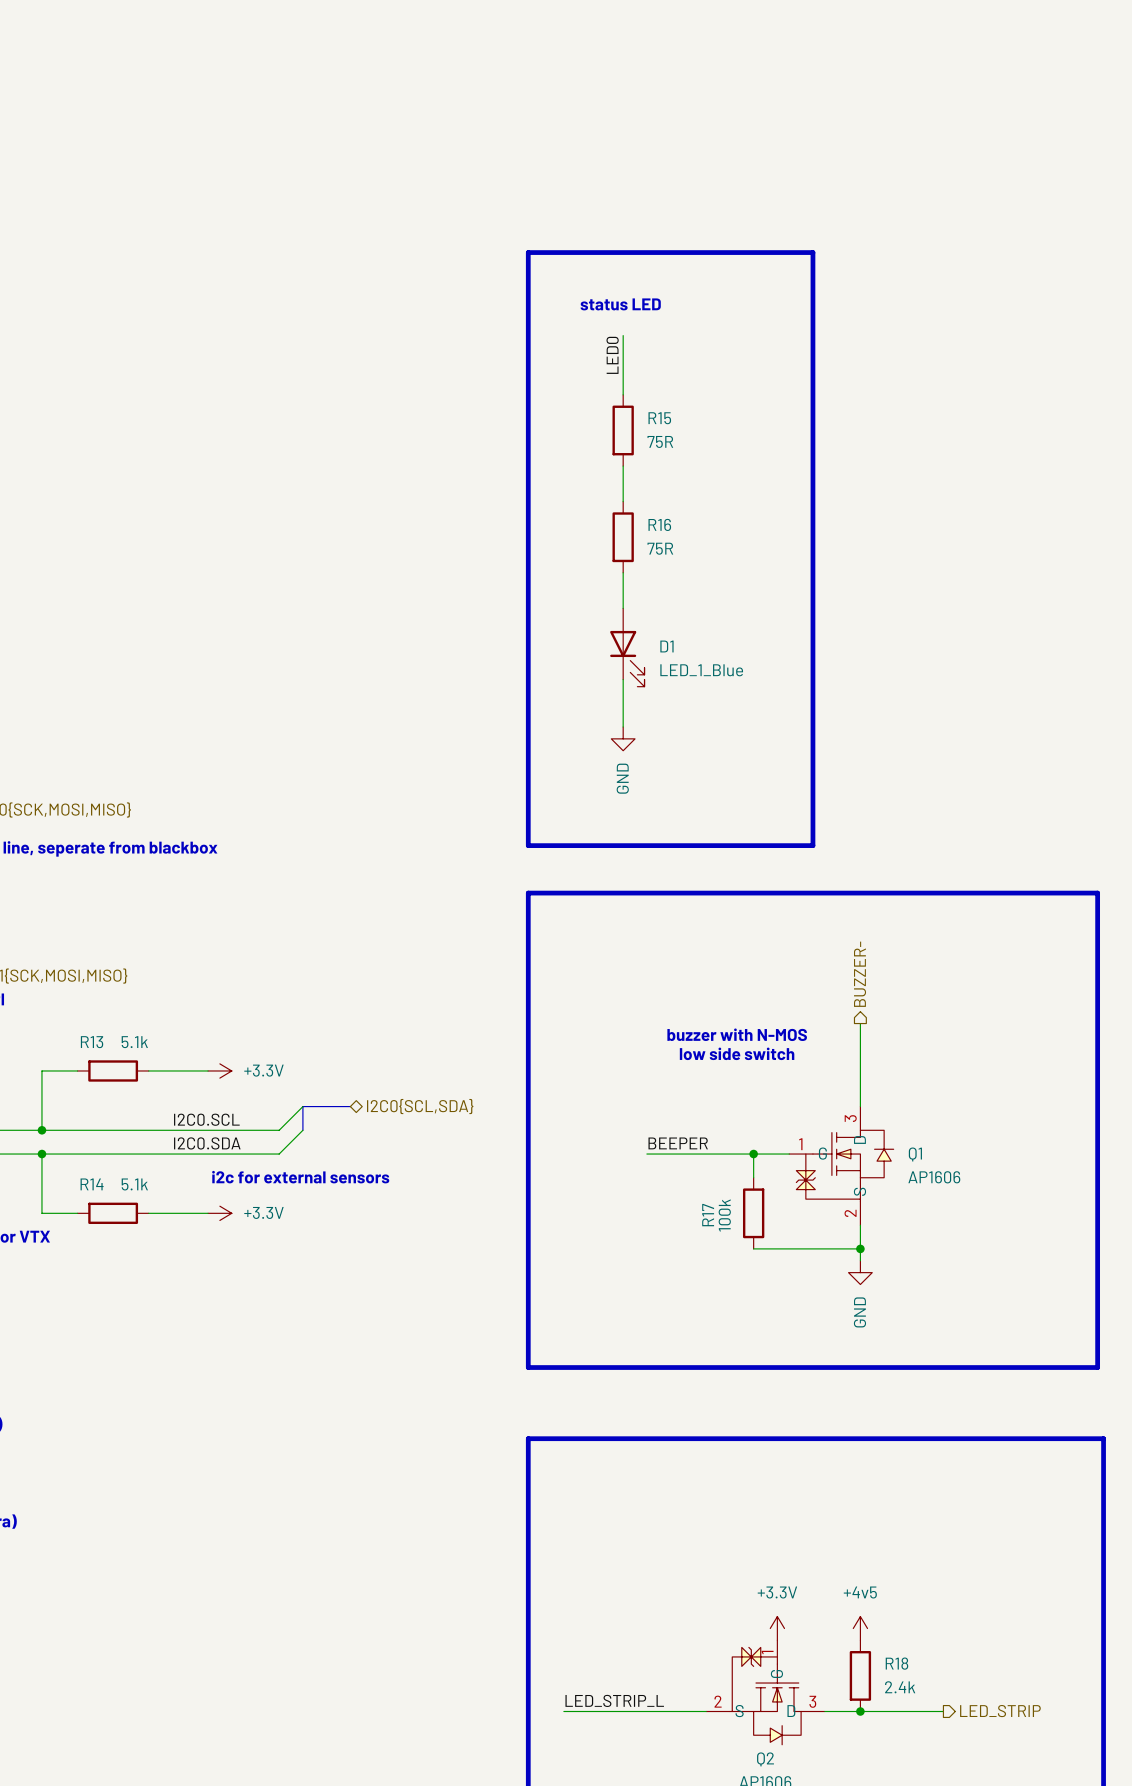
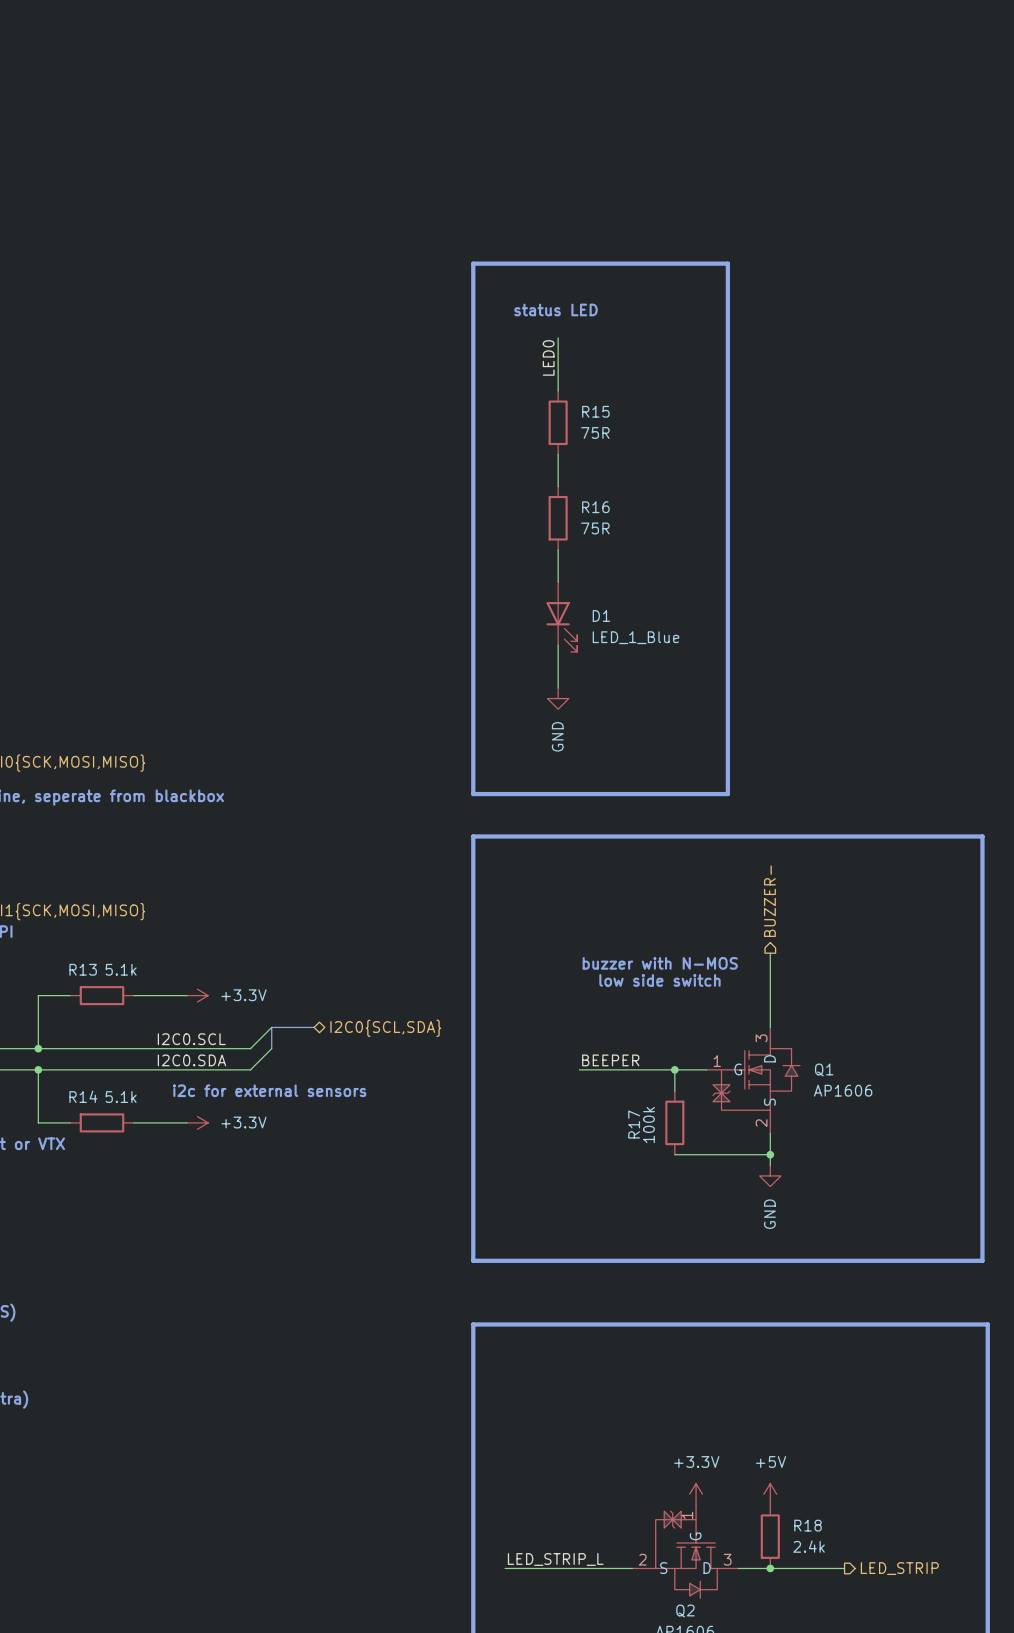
power symbol: +4v5 (860, 1628) -> +5V (770, 1494)

